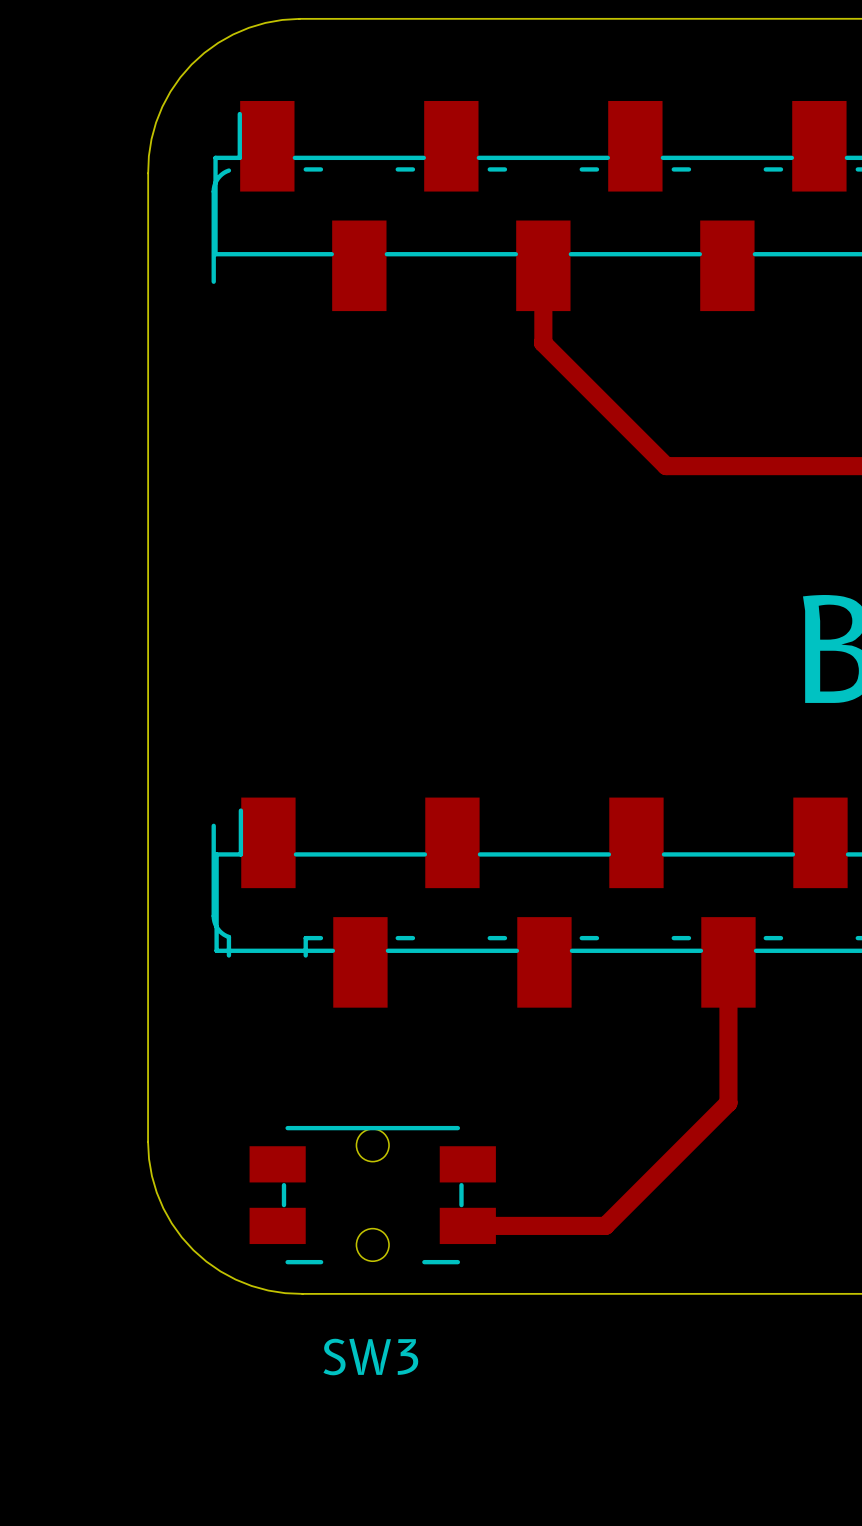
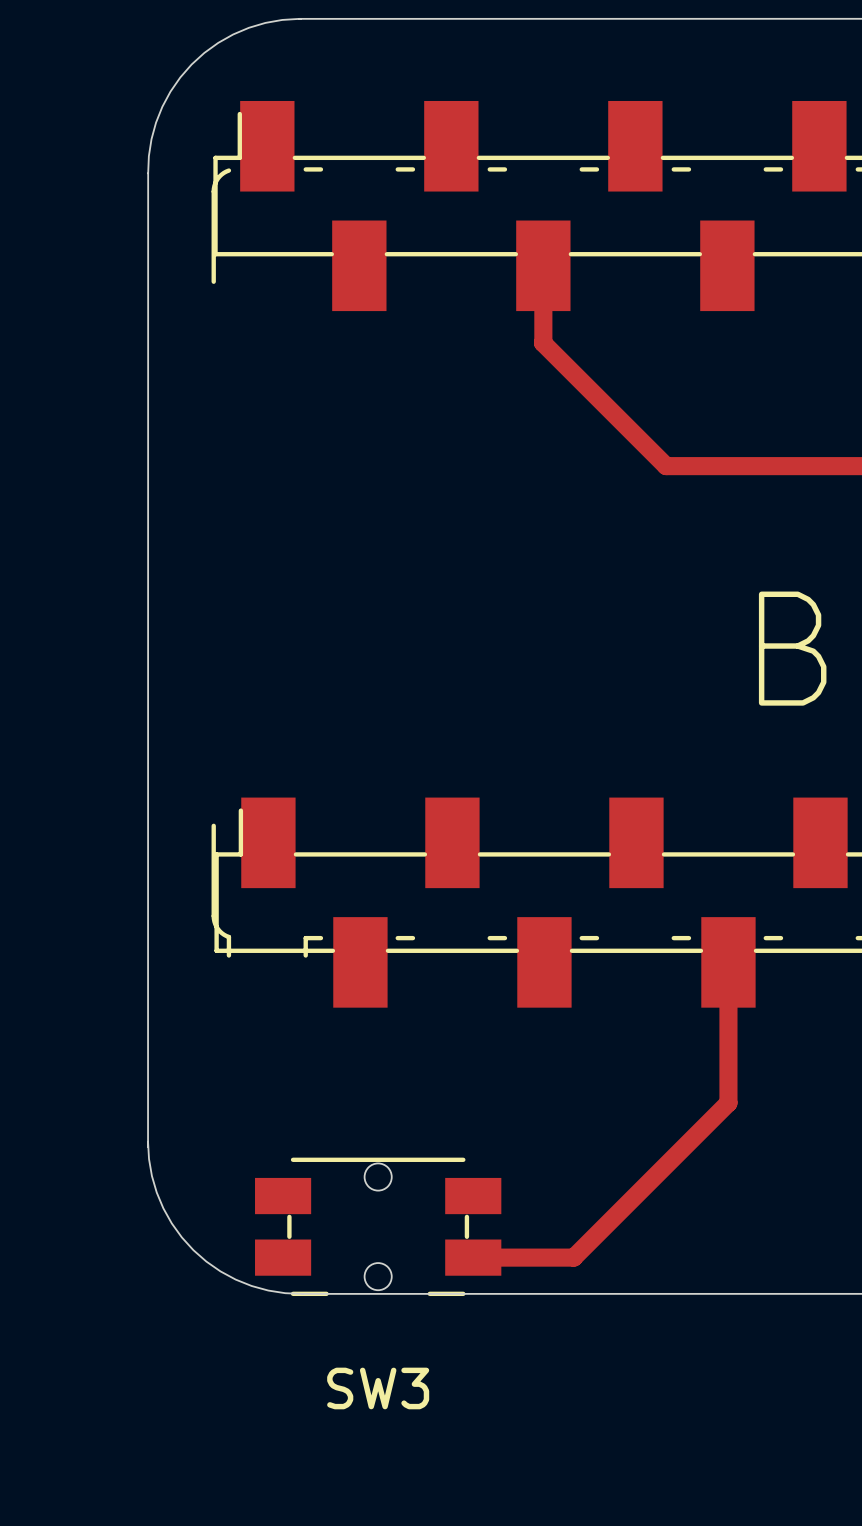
SW3 footprint: [249, 1125, 496, 1265] -> [255, 1157, 502, 1297]
track: (467, 1225) (605, 1225) -> (473, 1257) (573, 1257) (605, 1225)
SW3 name position: SW3 (370, 1356) -> SW3 (378, 1388)

